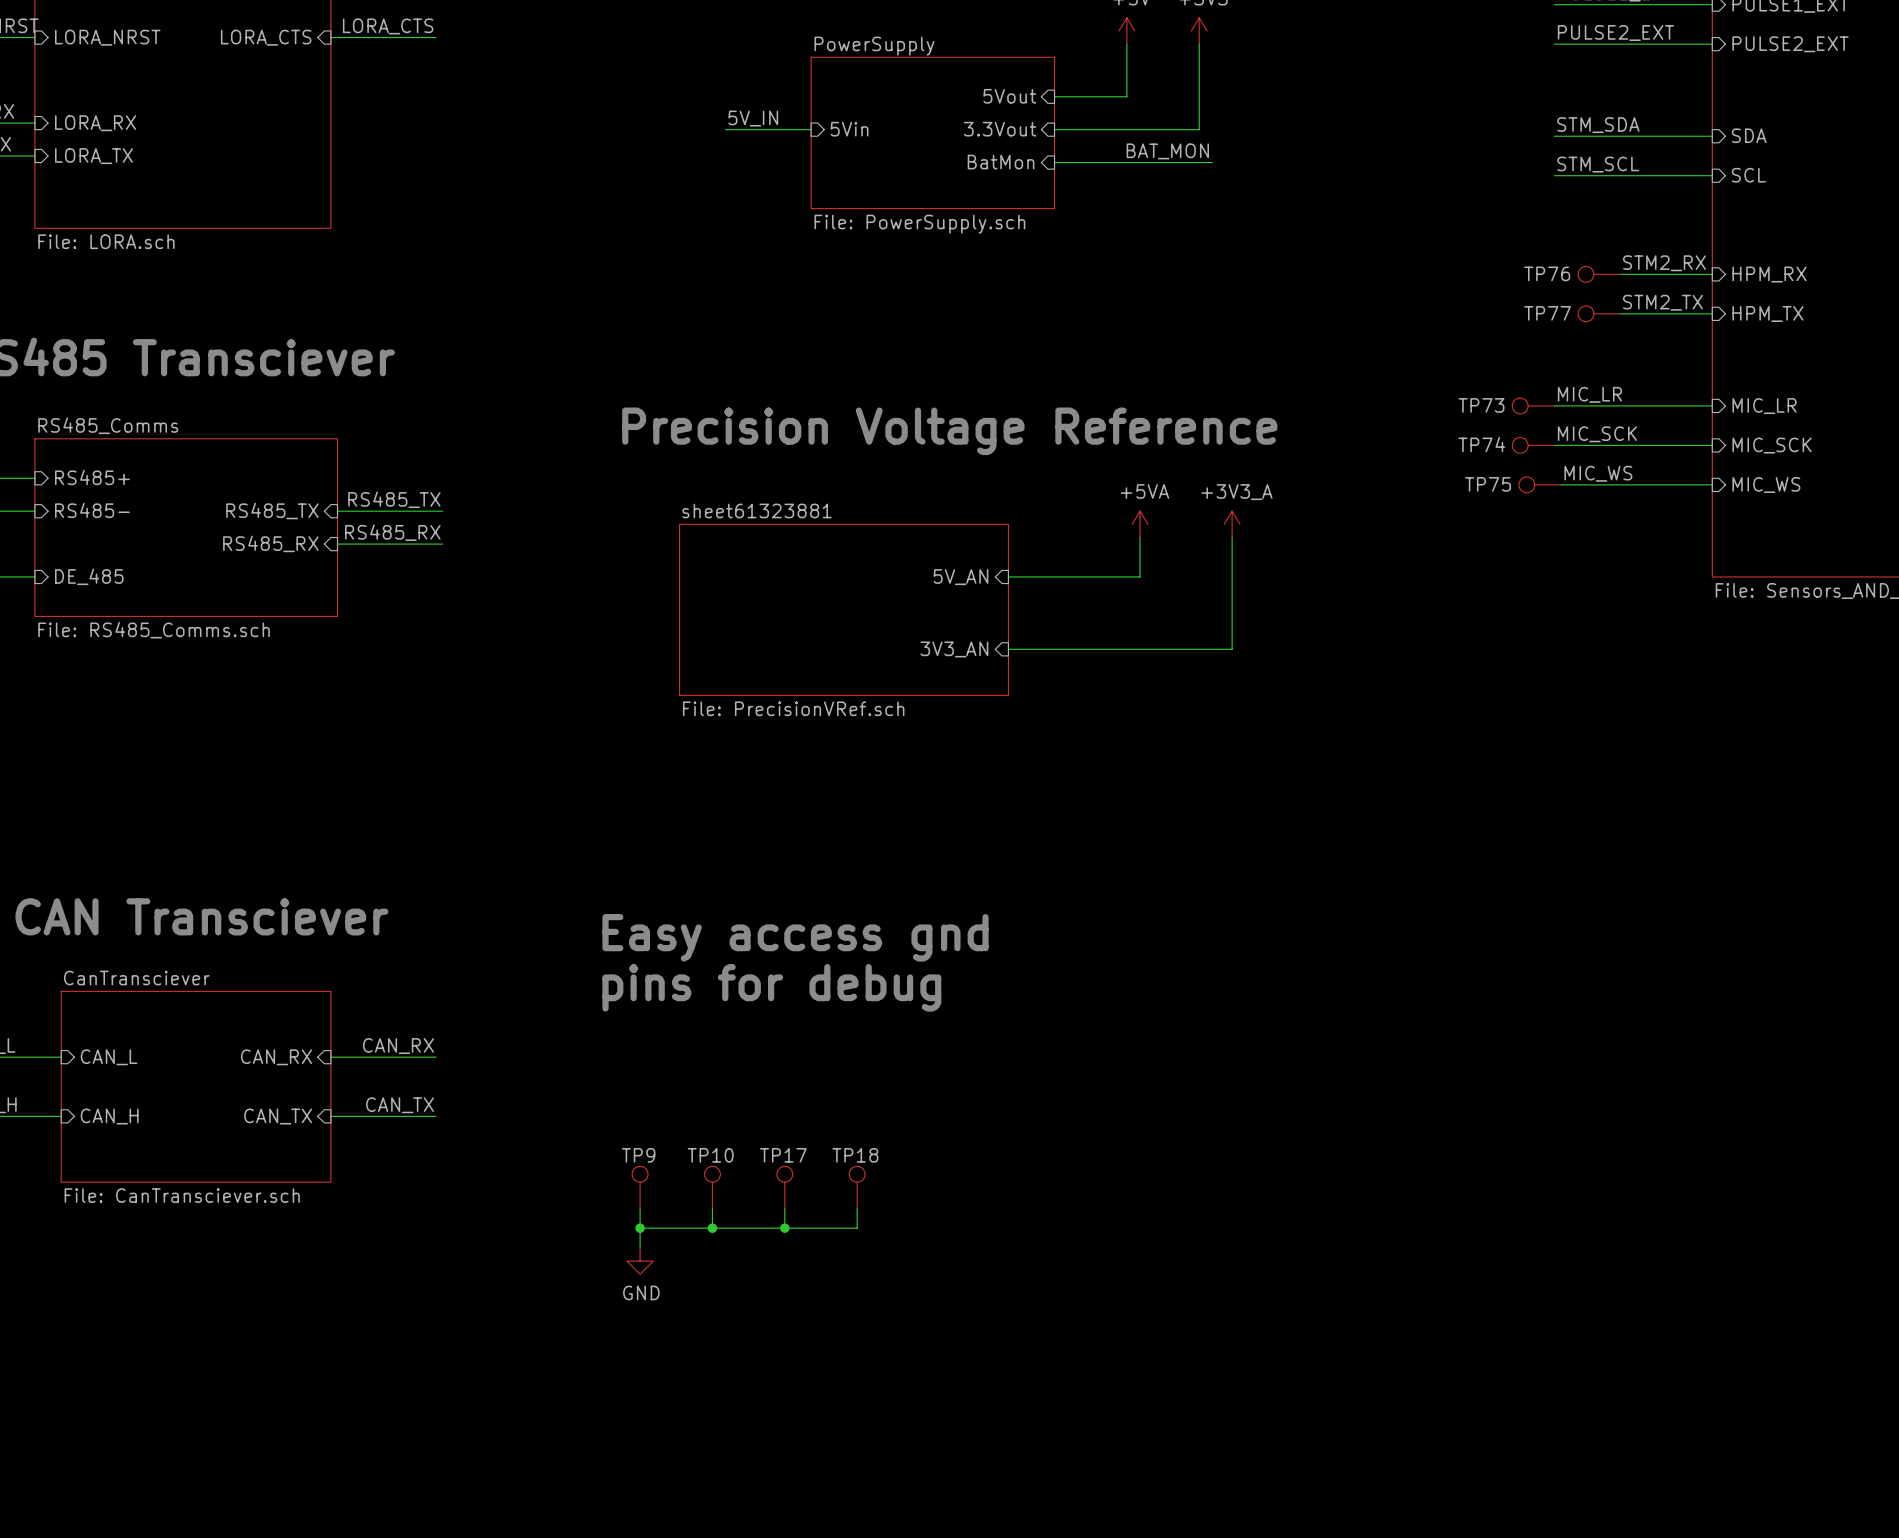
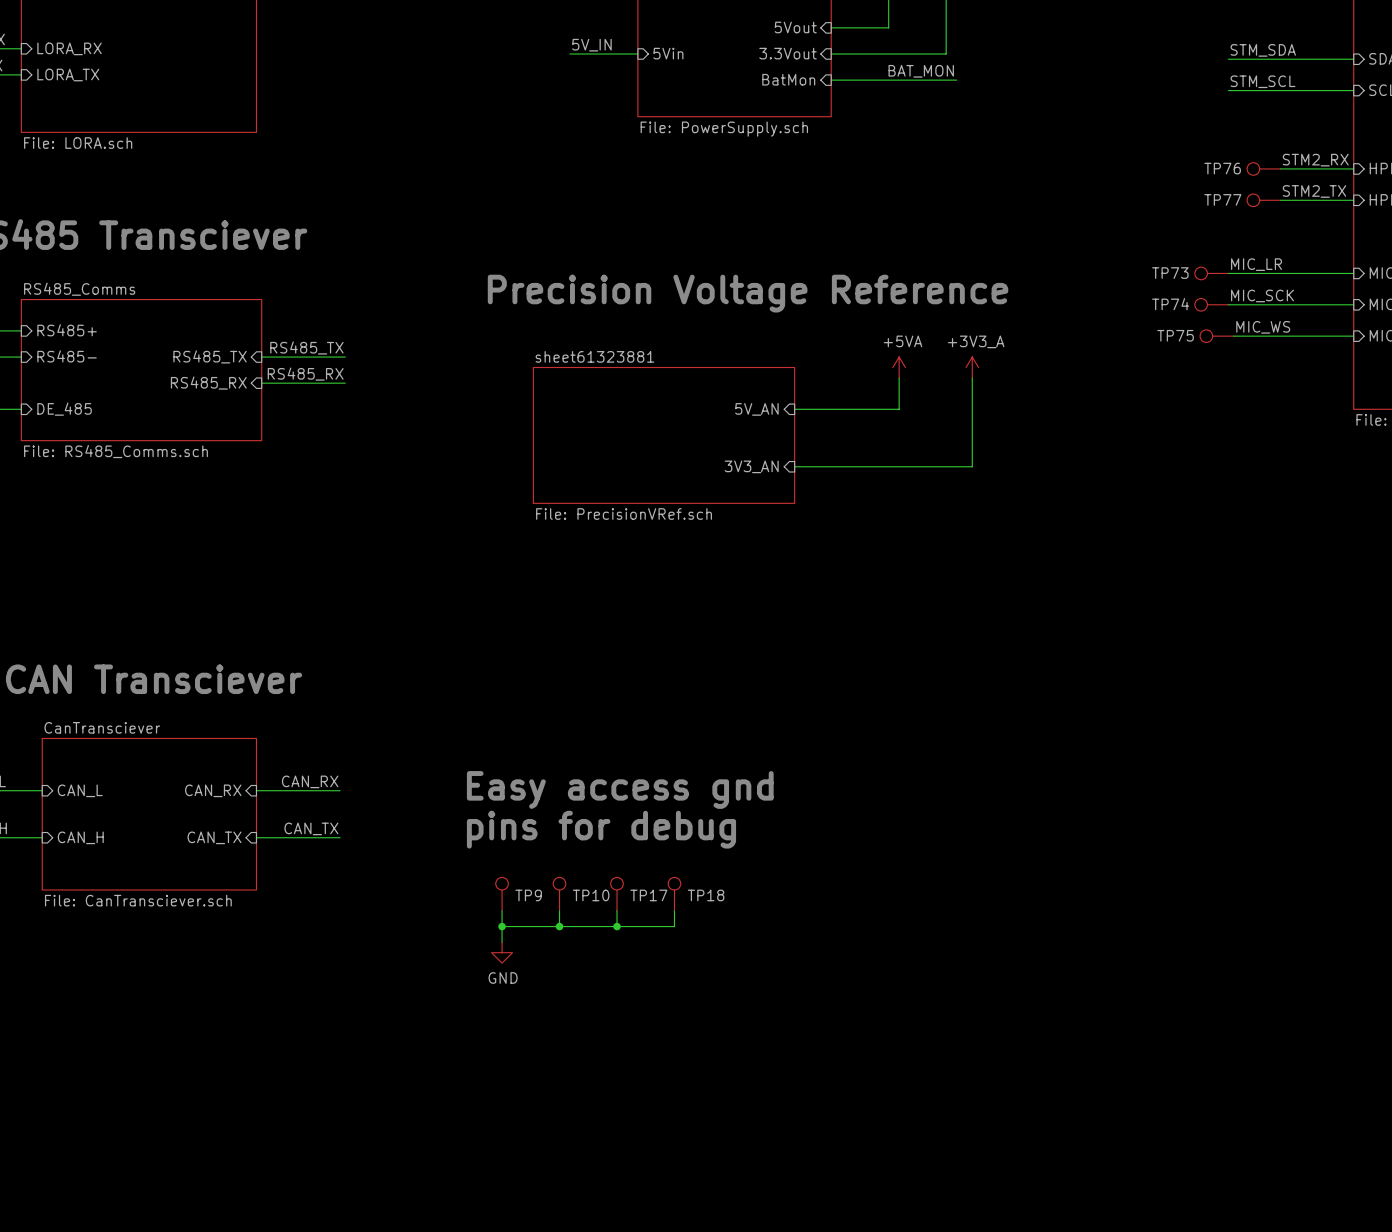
text position: Easy access gnd (795, 937) -> Easy access gnd (620, 789)
text position: pins for debug (771, 987) -> pins for debug (601, 829)
TP9 name position: TP9 (638, 1155) -> TP9 (528, 895)
TP10 name position: TP10 (710, 1155) -> TP10 (591, 895)
TP17 name position: TP17 (783, 1155) -> TP17 (648, 895)
TP18 name position: TP18 (855, 1155) -> TP18 (706, 895)

